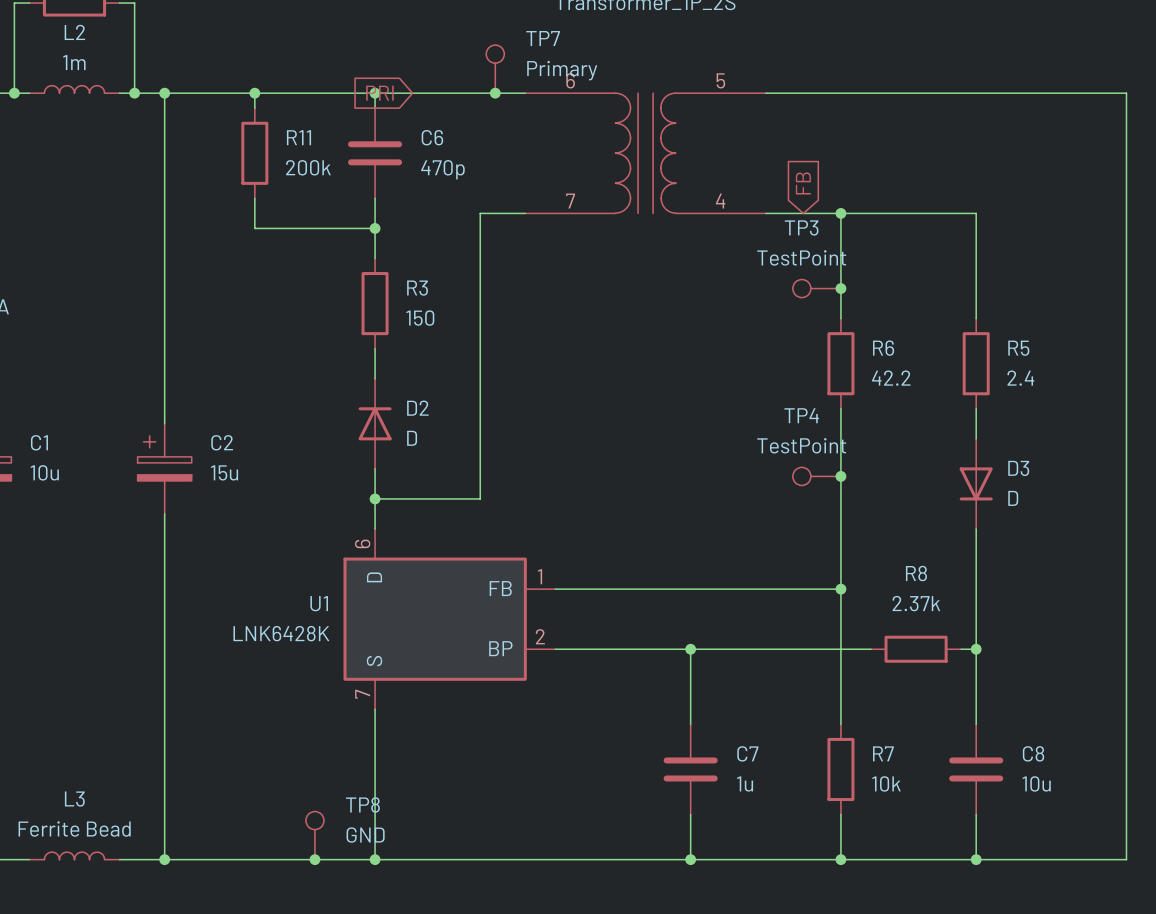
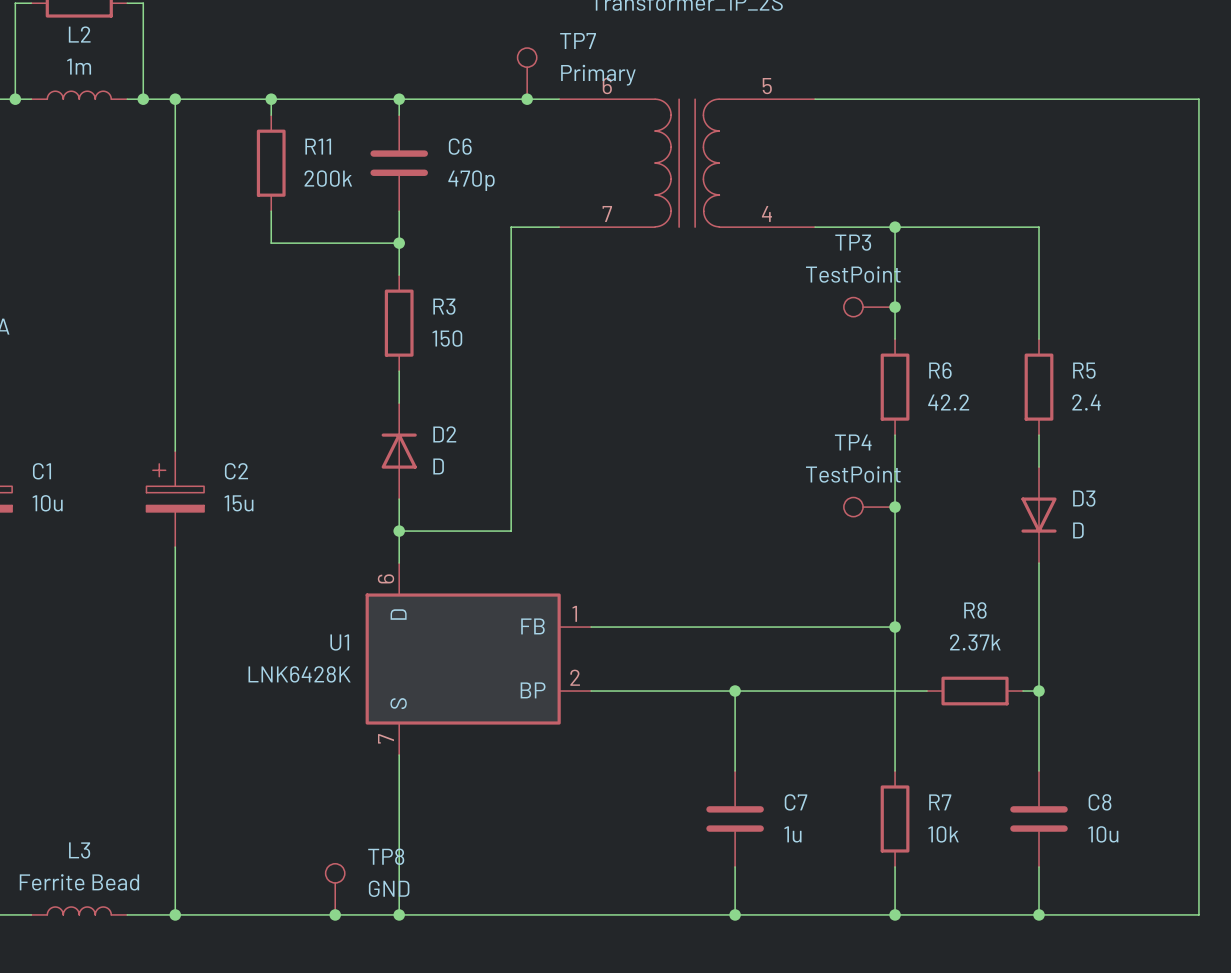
global label: PRI (379, 93) -> none
global label: FB (803, 183) -> none

